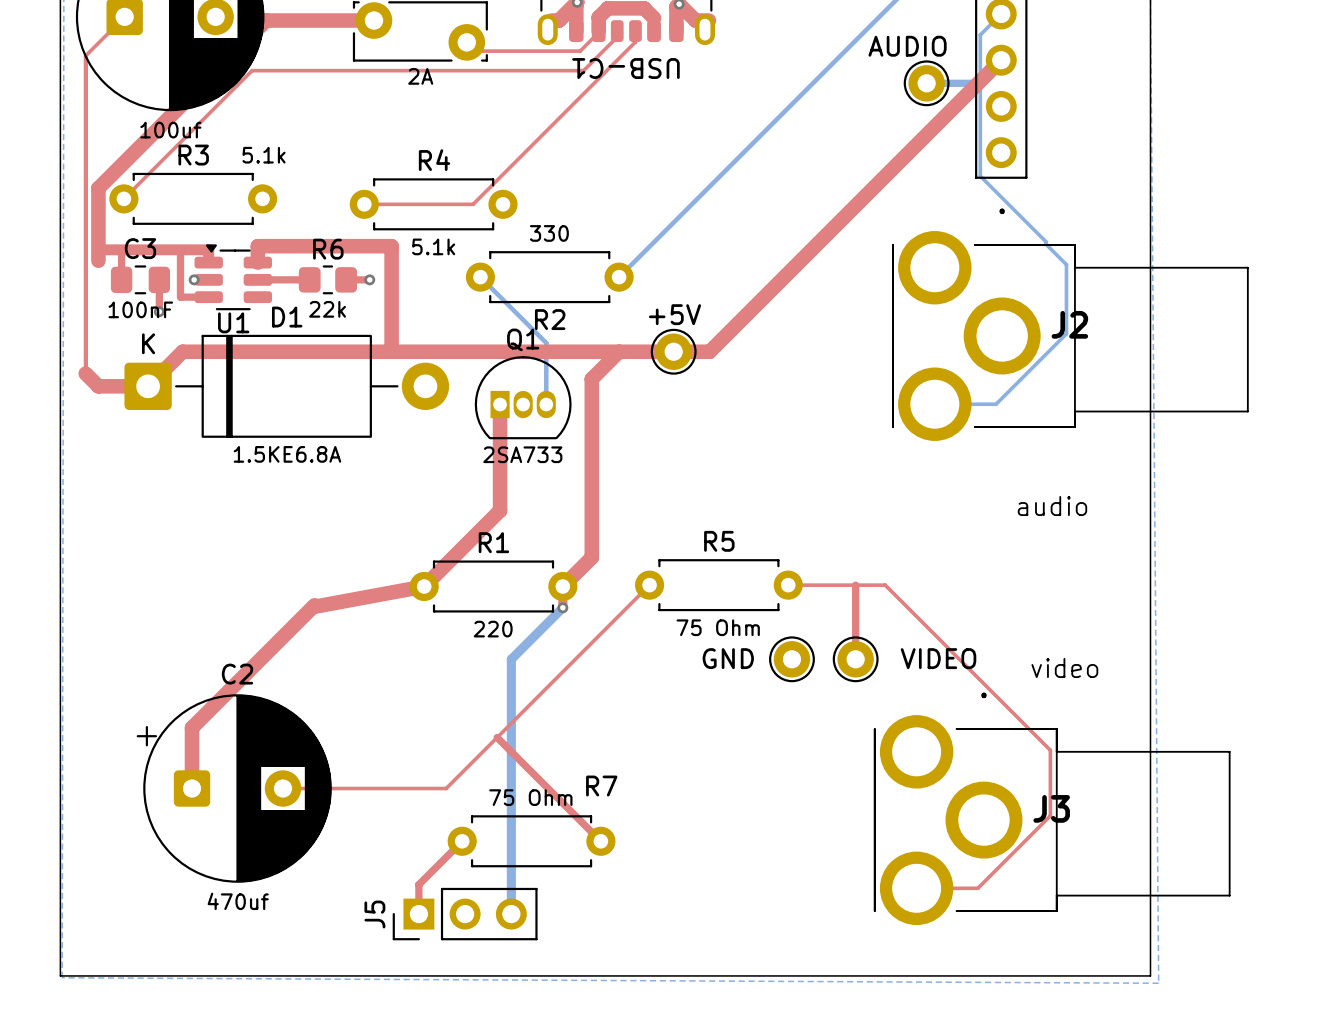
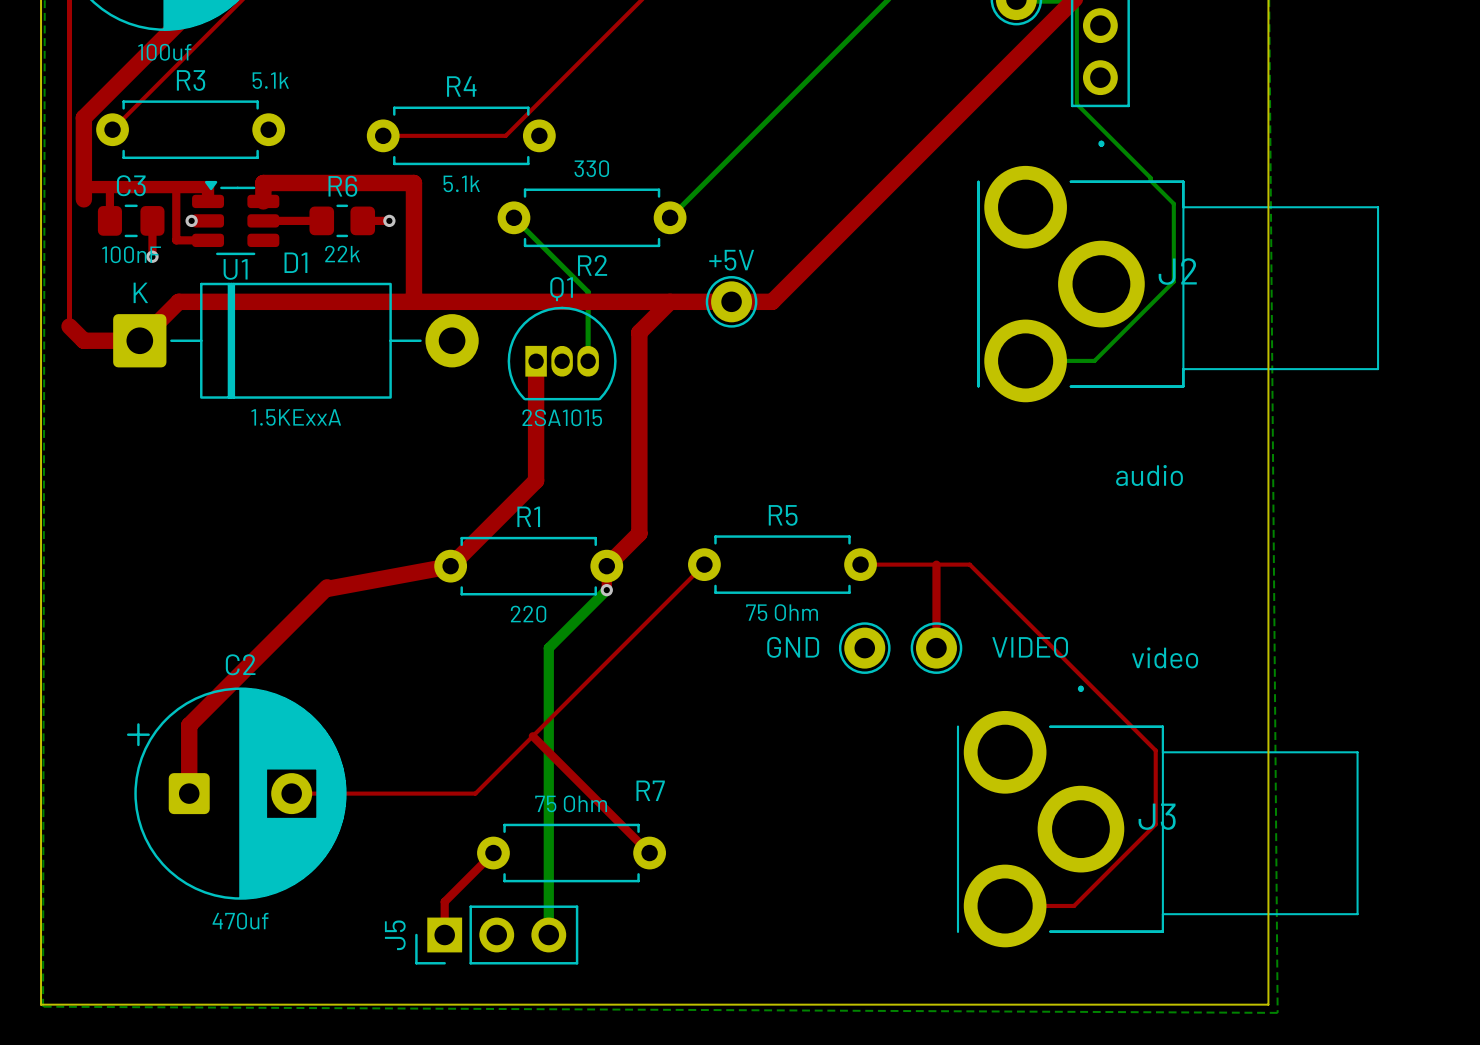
D1 value: 1.5KE6.8A (287, 454) -> 1.5KExxA (296, 417)
Q1 value: 2SA733 (522, 454) -> 2SA1015 (562, 417)

